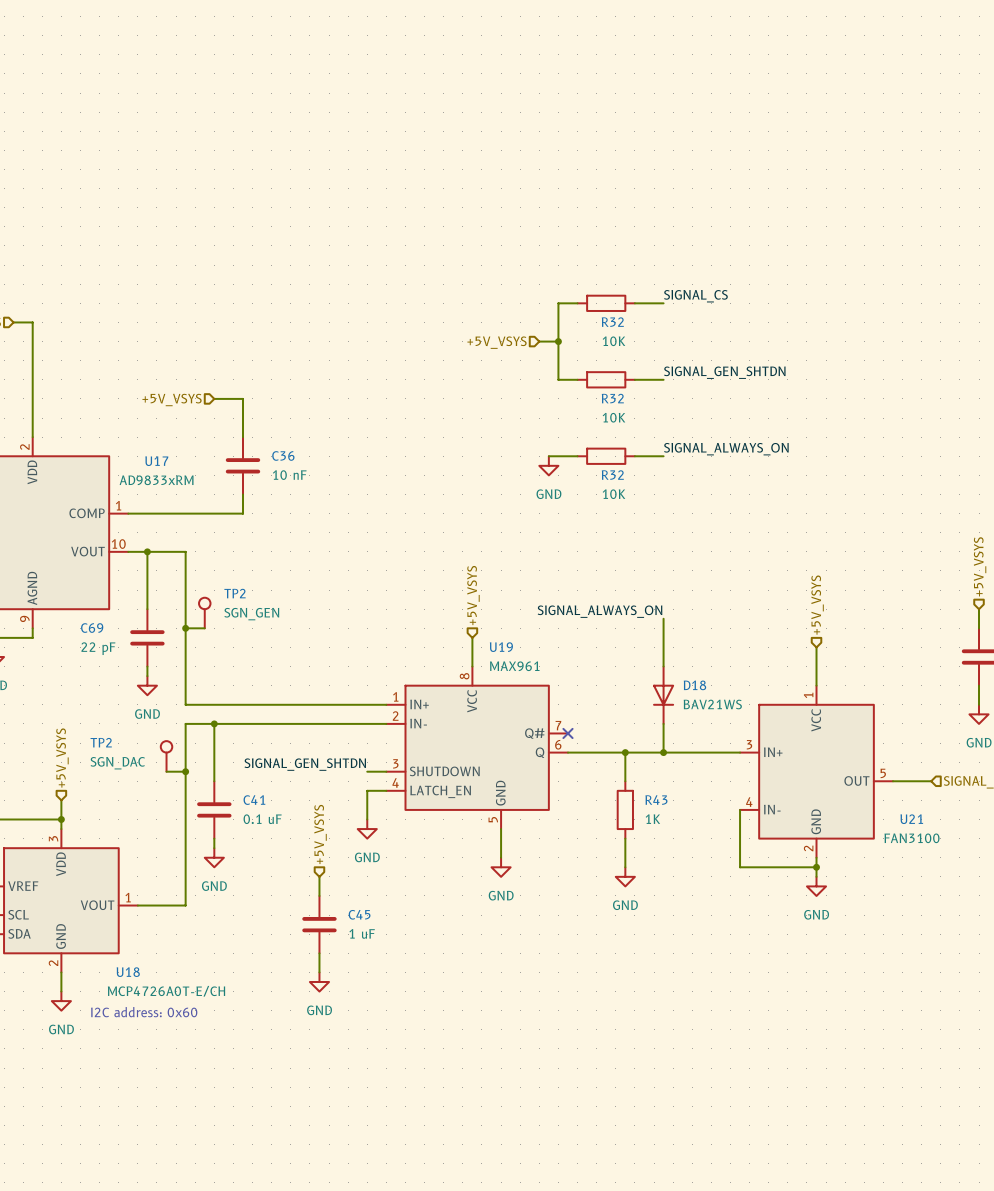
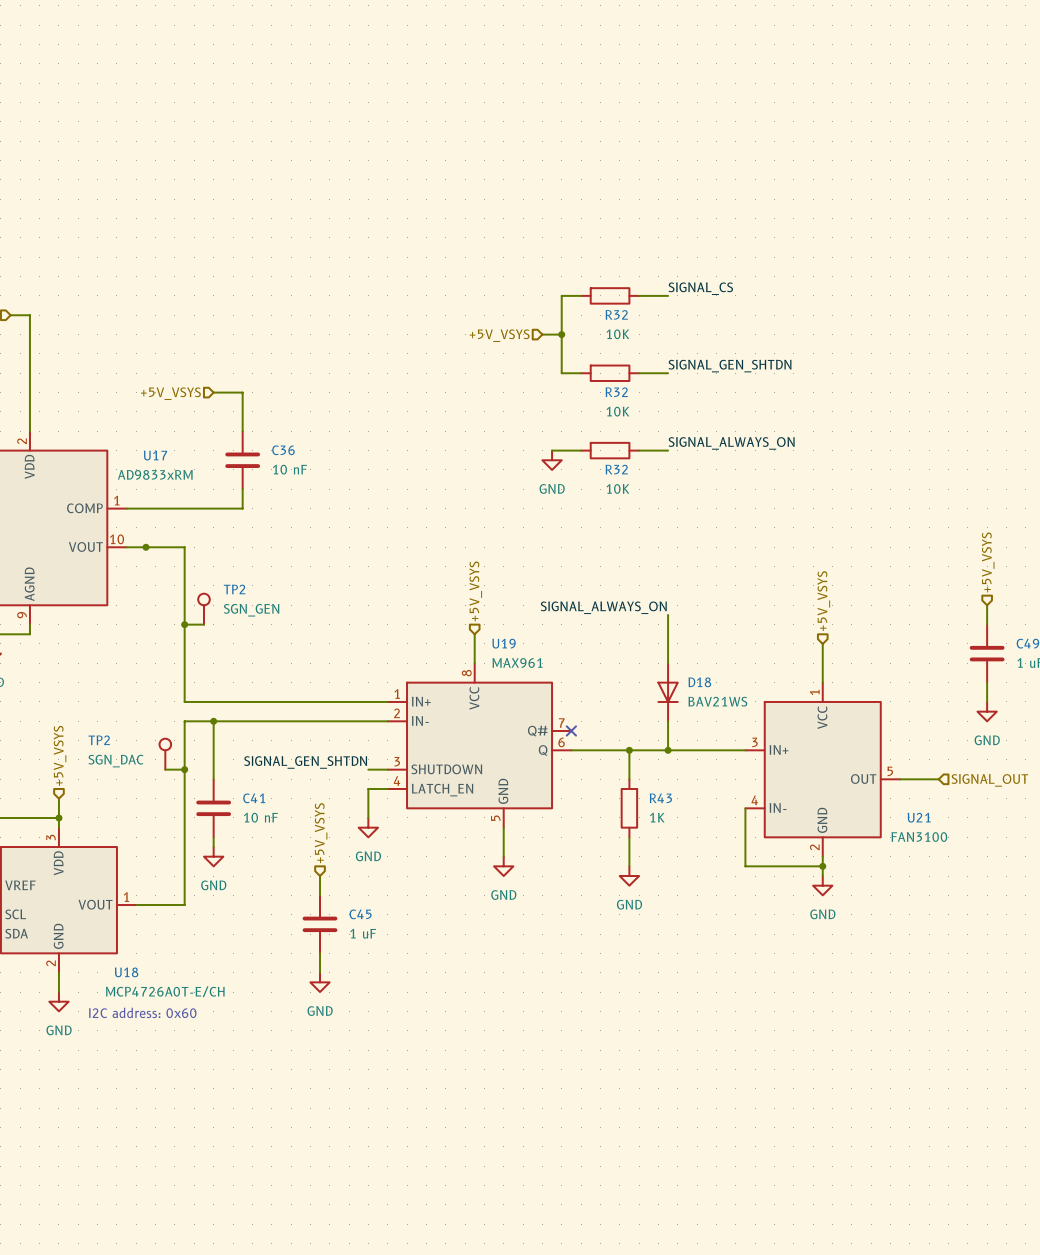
wire: (147, 551) (147, 609) -> none
C69: 22 pF (147, 637) -> none
wire: (147, 666) (147, 676) -> none
power symbol: GND (147, 685) -> none
C41 value: 0.1 uF (262, 819) -> 10 nF (260, 817)

